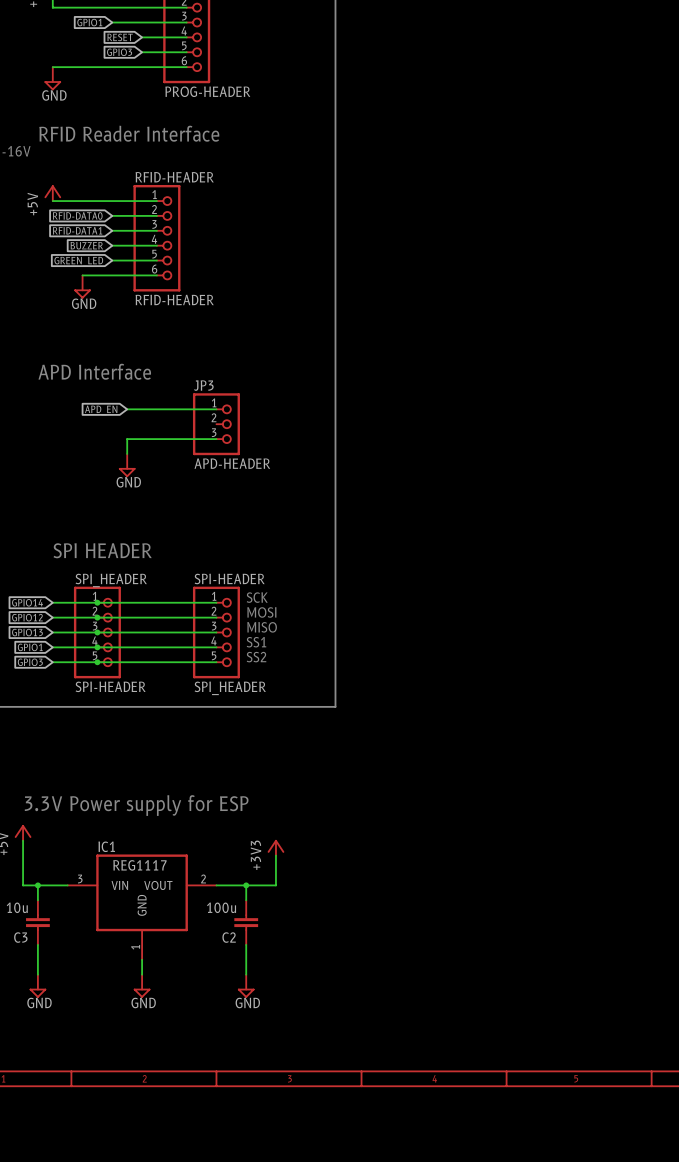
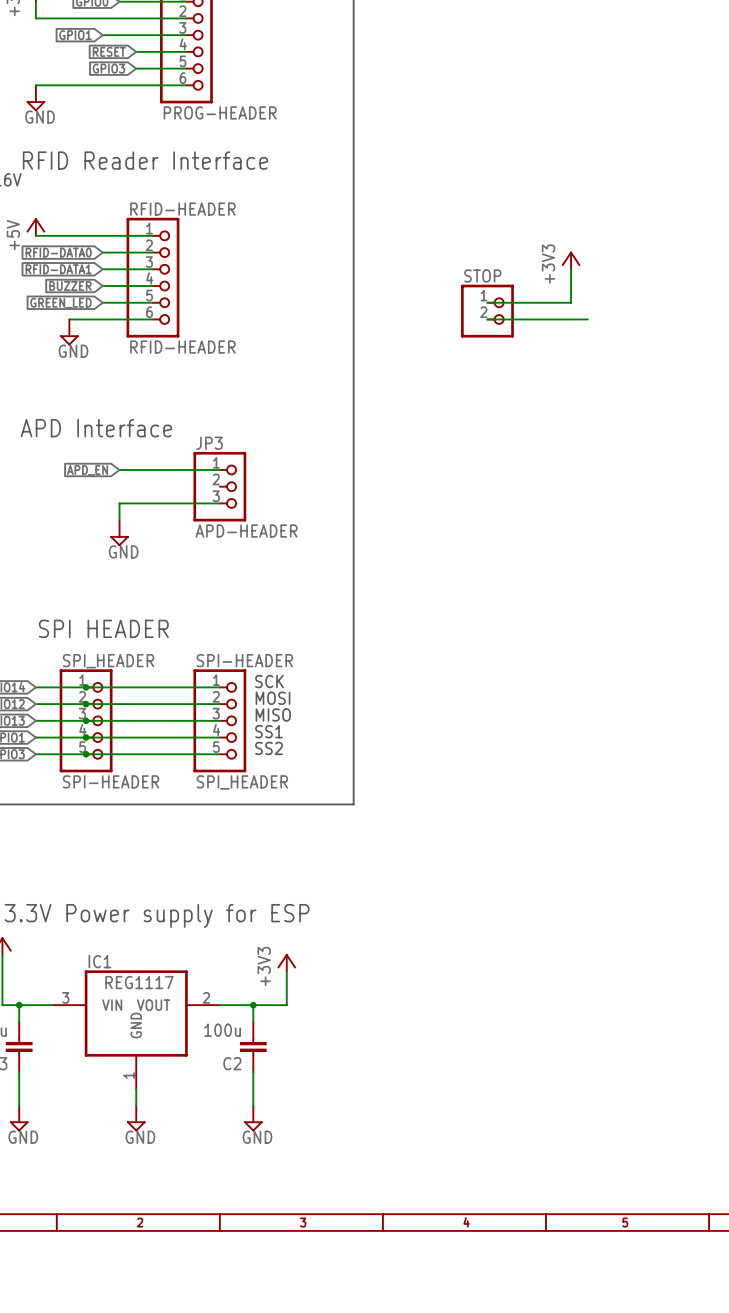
power symbol: none -> +3V3 (571, 260)
wire: none -> (571, 269) (571, 302) (487, 302)
STOP: none -> (487, 311)
wire: none -> (487, 319) (587, 319)

